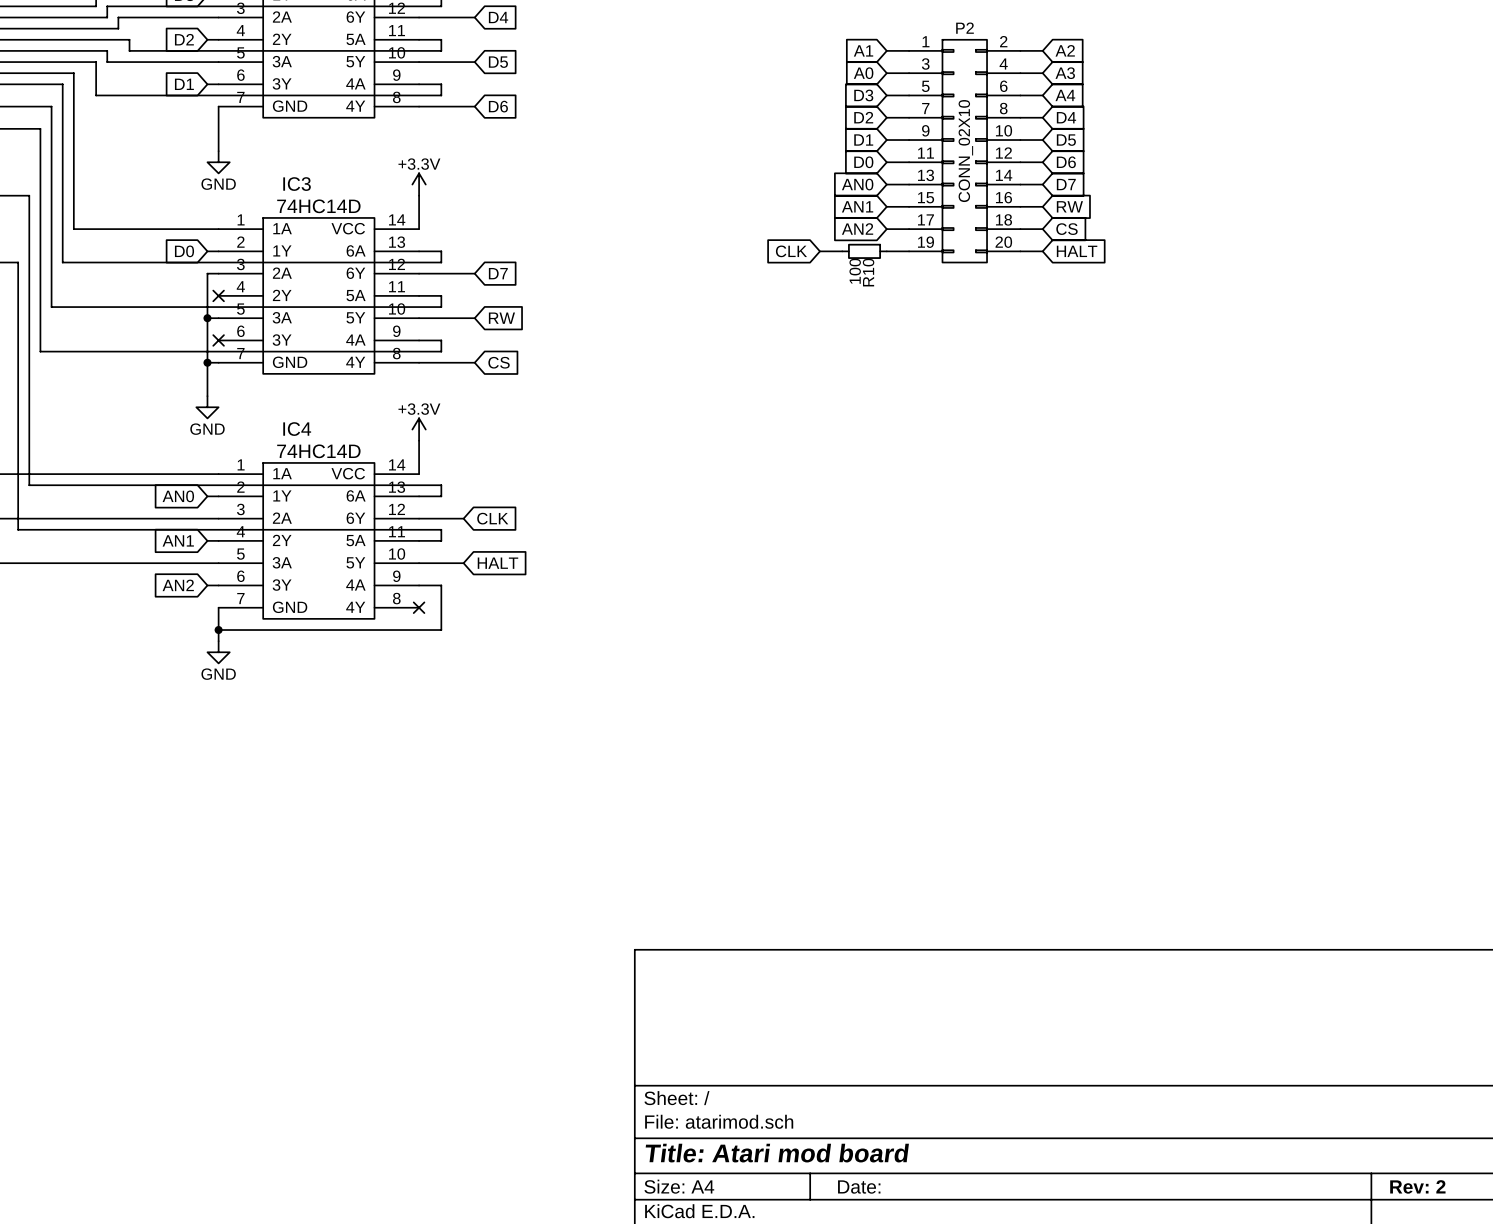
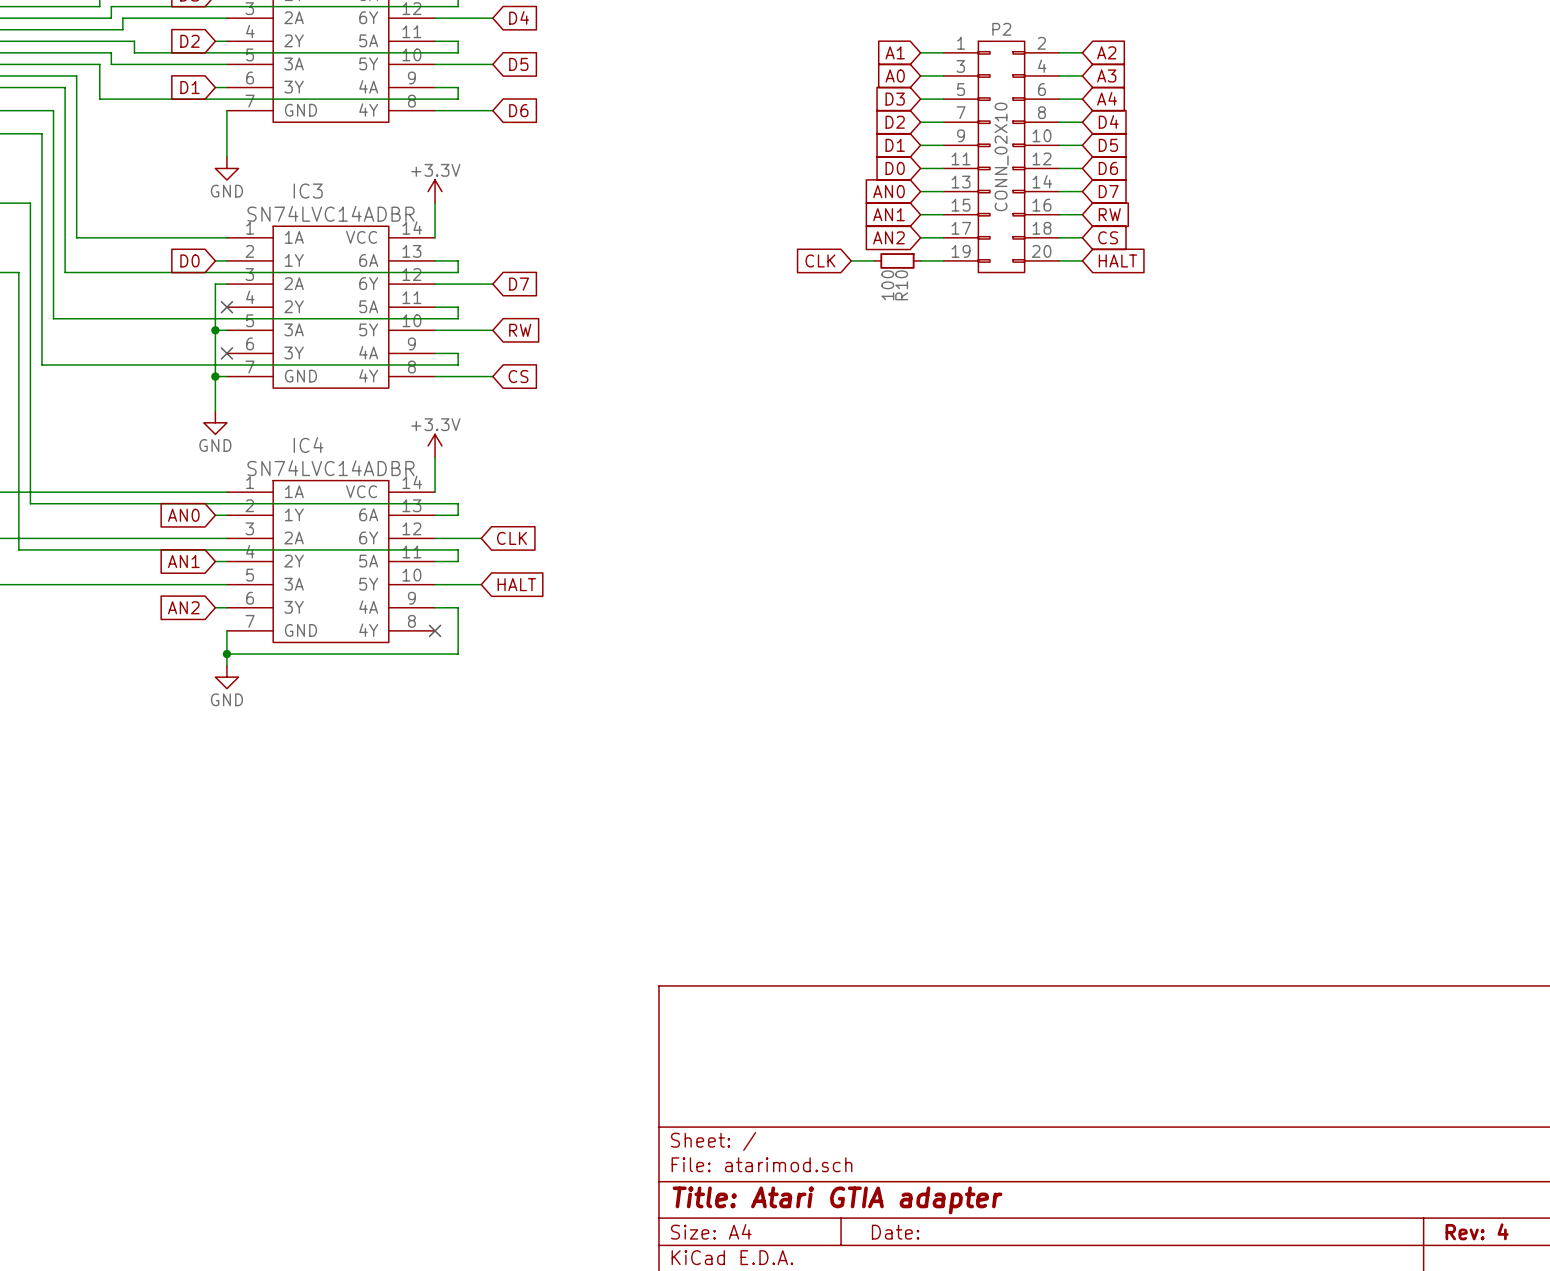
IC3 value: 74HC14D (318, 206) -> SN74LVC14ADBR (330, 213)
IC4 value: 74HC14D (318, 451) -> SN74LVC14ADBR (330, 468)
title block: Title: Atari mod board (777, 1153) -> Title: Atari GTIA adapter (837, 1200)
title block: Rev: 2 (1417, 1186) -> Rev: 4 (1477, 1231)

